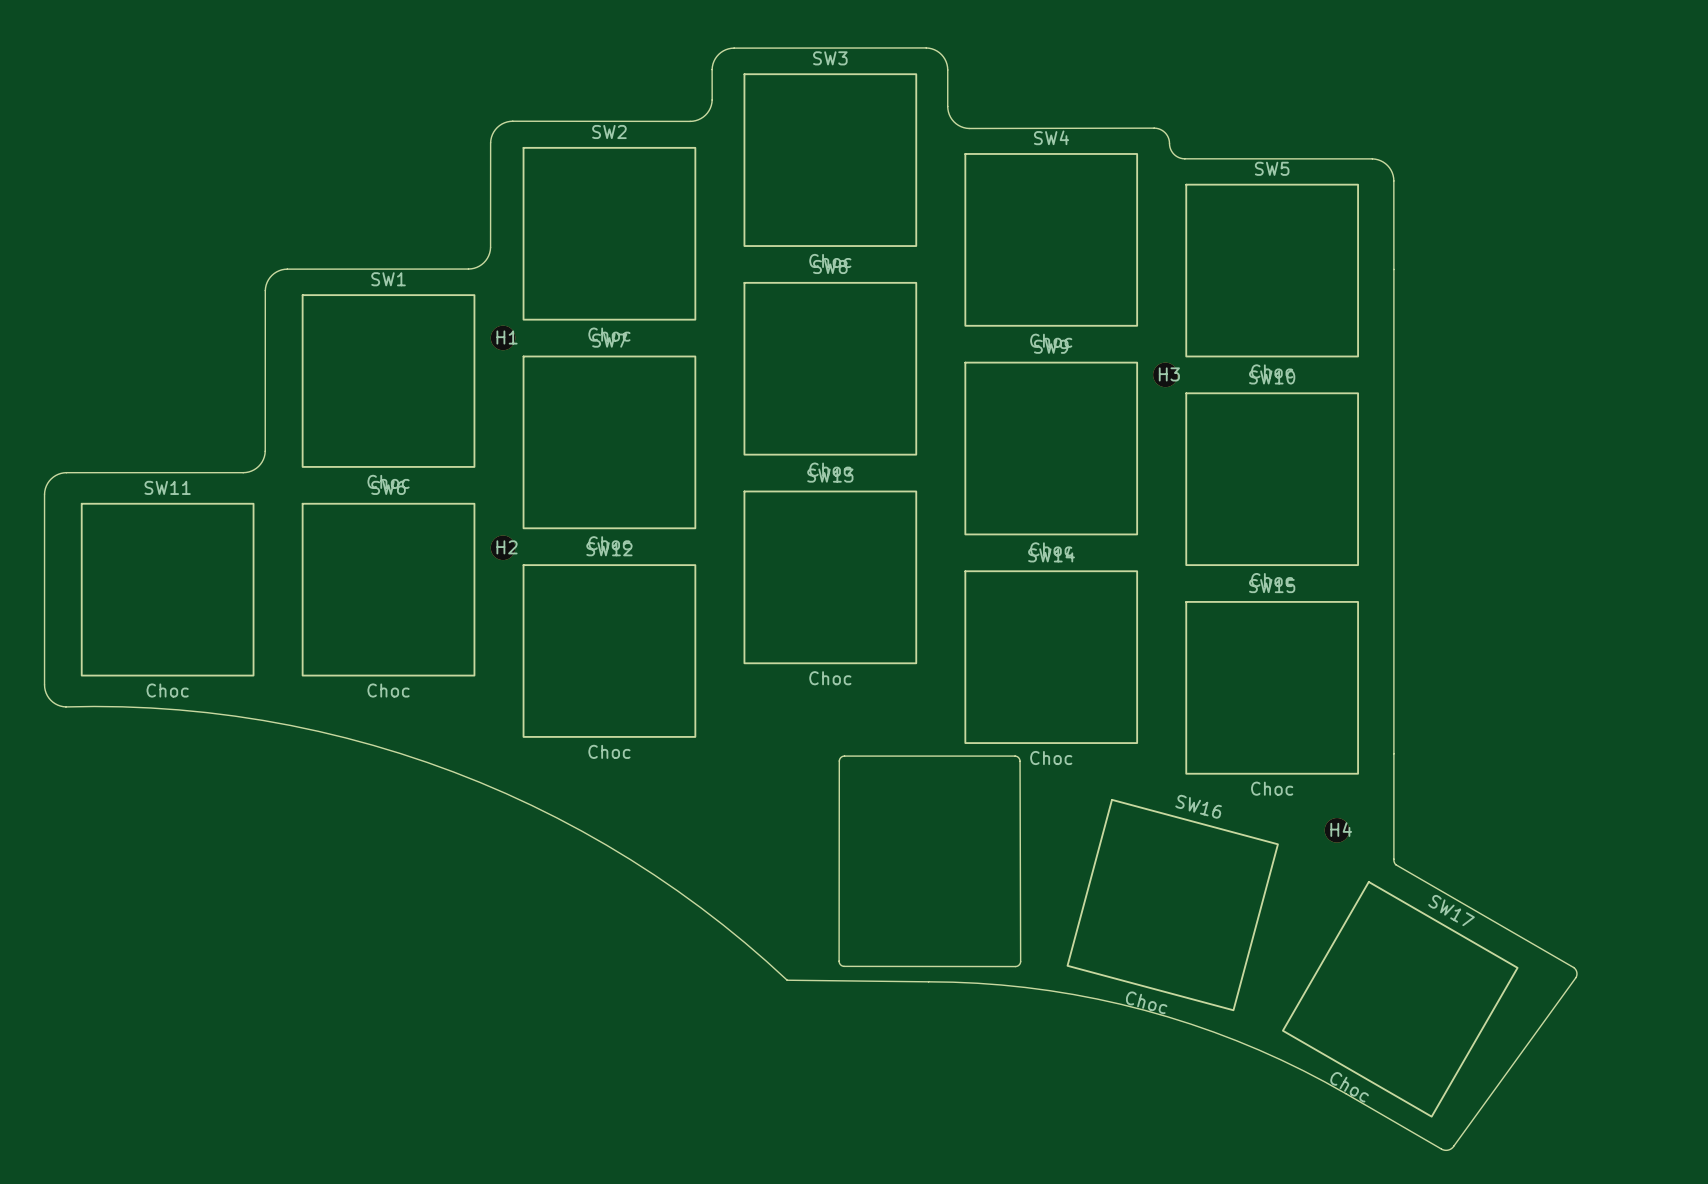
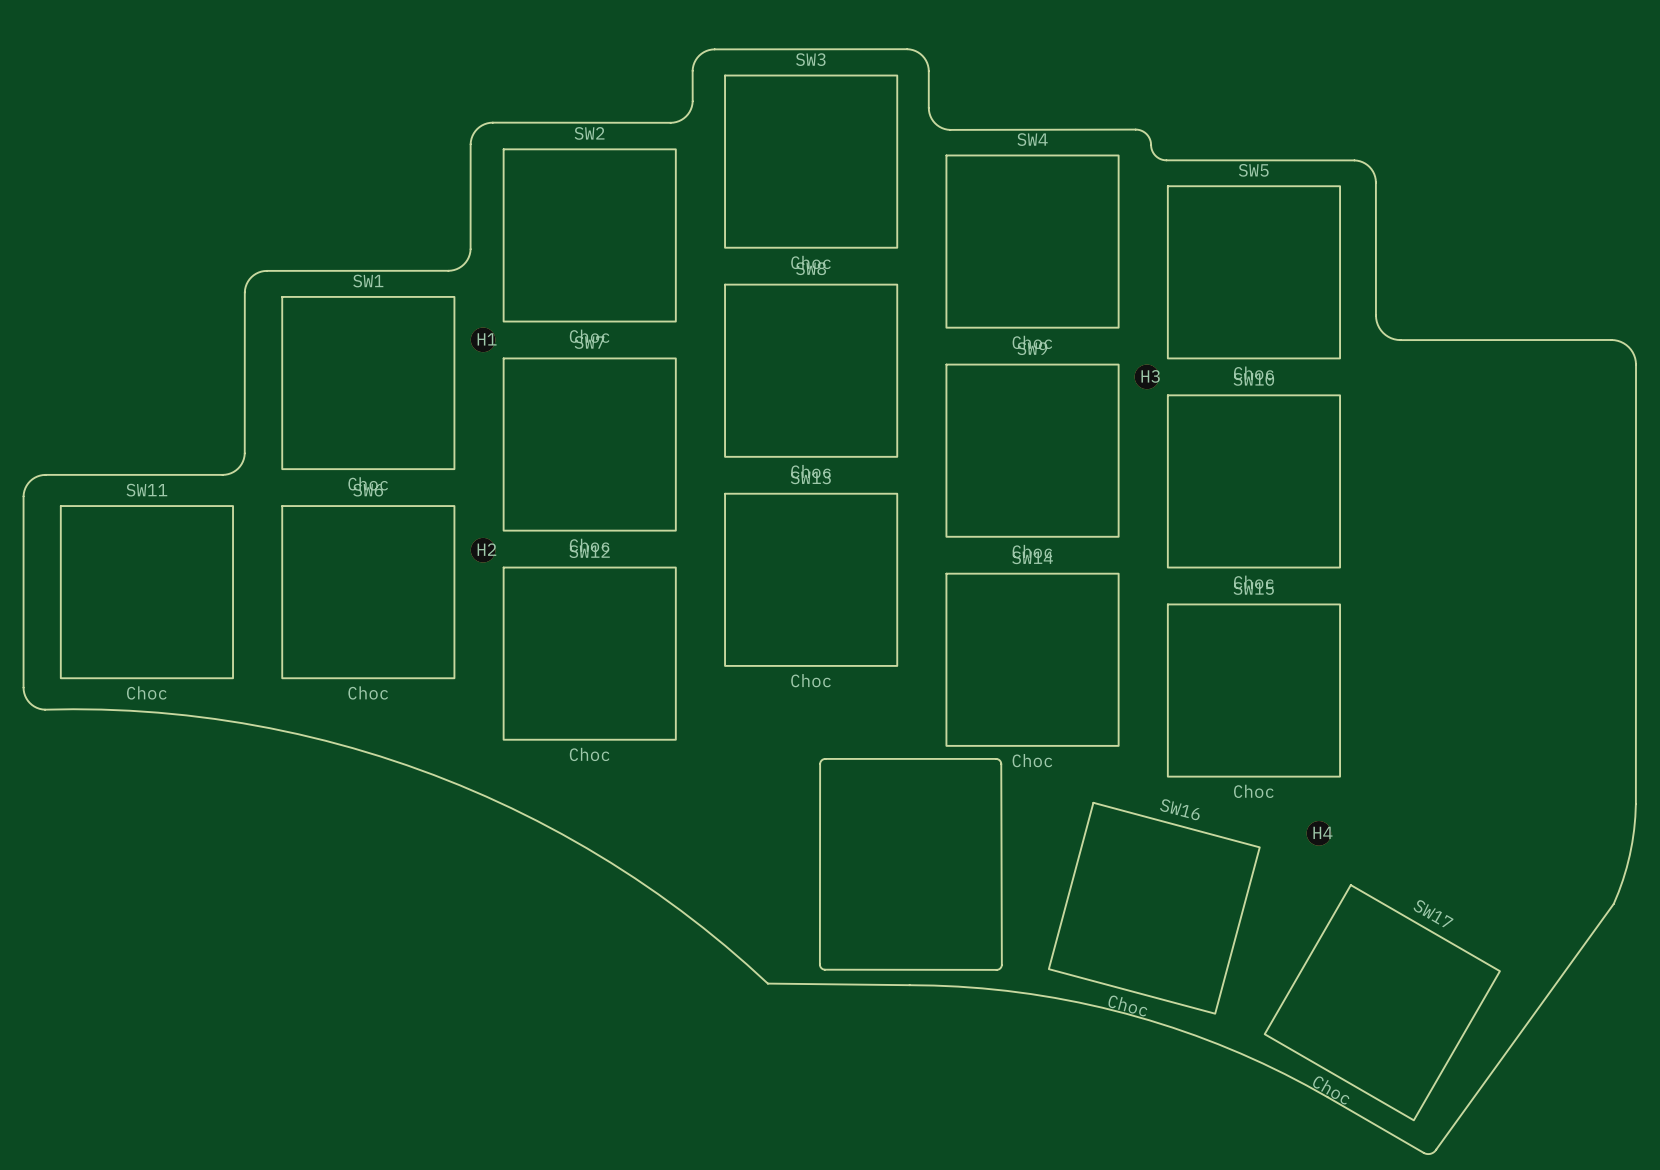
board edge: (1393, 180) (1394, 861) (1395, 864) (1573, 967) (1576, 972) (1576, 977) (1454, 1145) -> (1375, 182) (1375, 315) (1379, 327) (1385, 335) (1400, 340) (1614, 340) (1623, 343) (1630, 349) (1636, 364) (1635, 804) (1632, 842) (1626, 867) (1613, 903) (1436, 1149)

